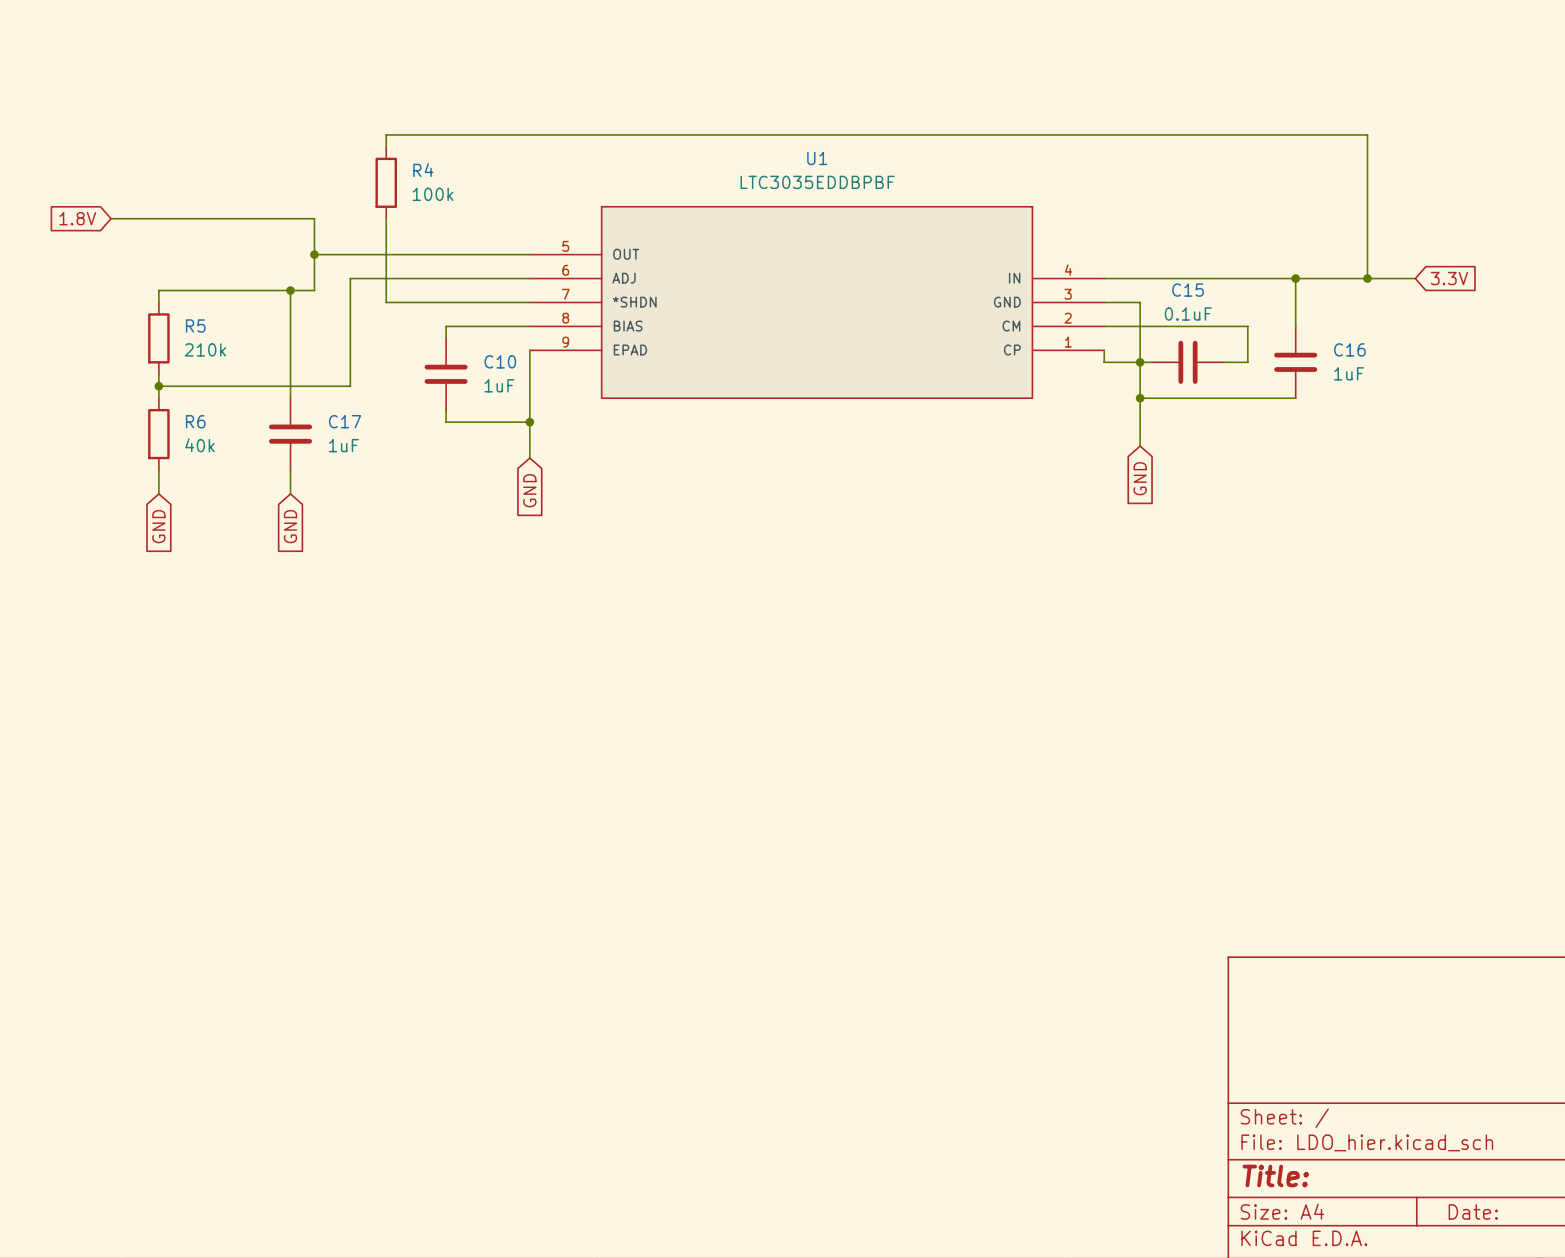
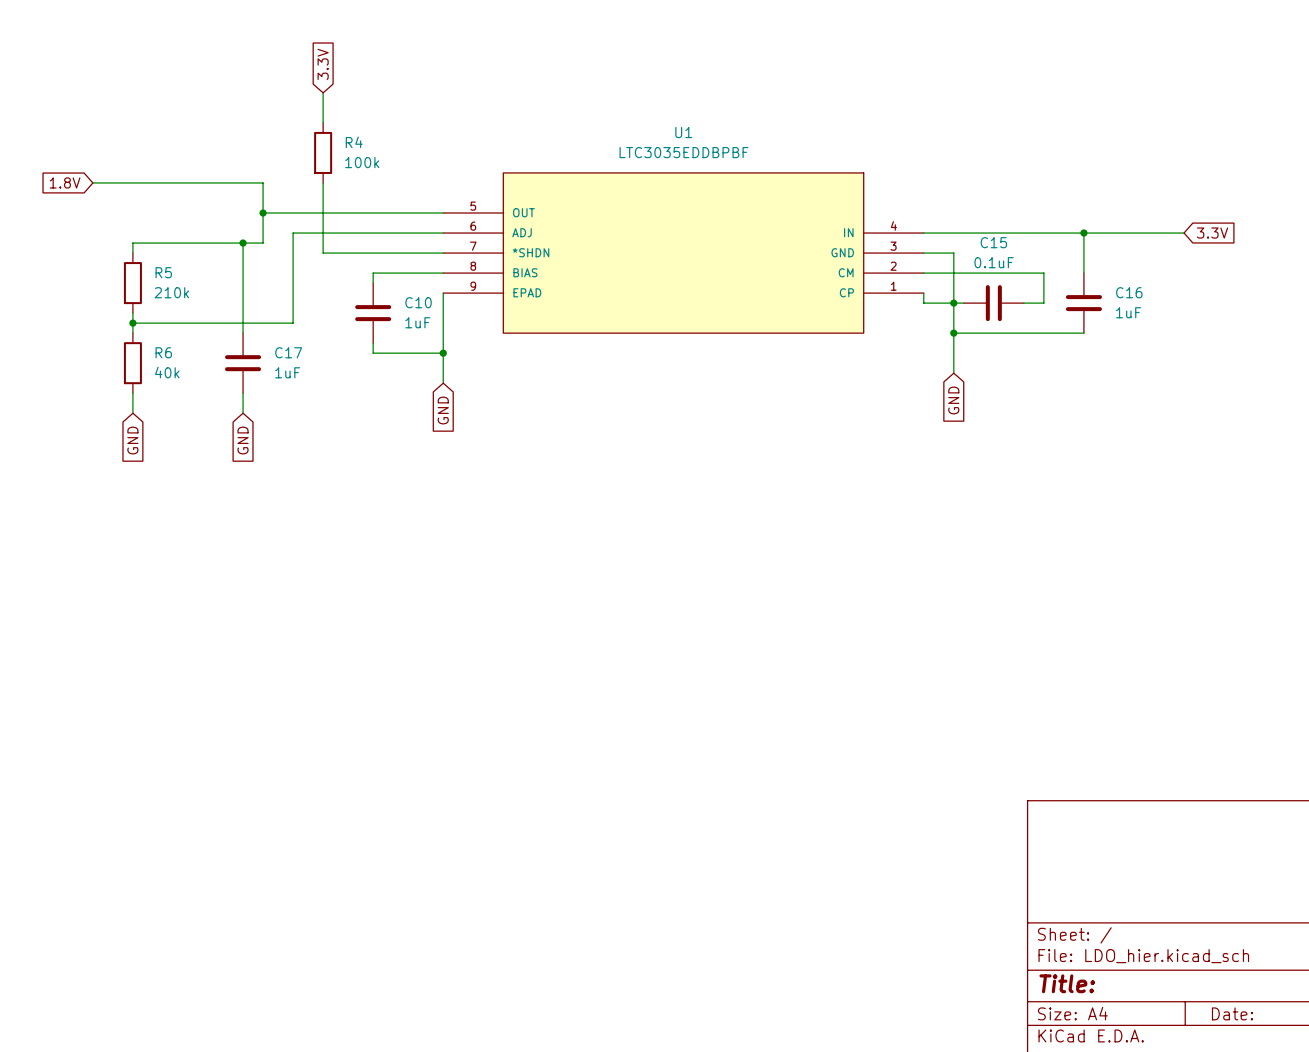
global label: none -> 3.3V (323, 64)
wire: (386, 134) (1367, 134) (1367, 278) -> (323, 112) (323, 92)
junction: (1367, 278) -> none

